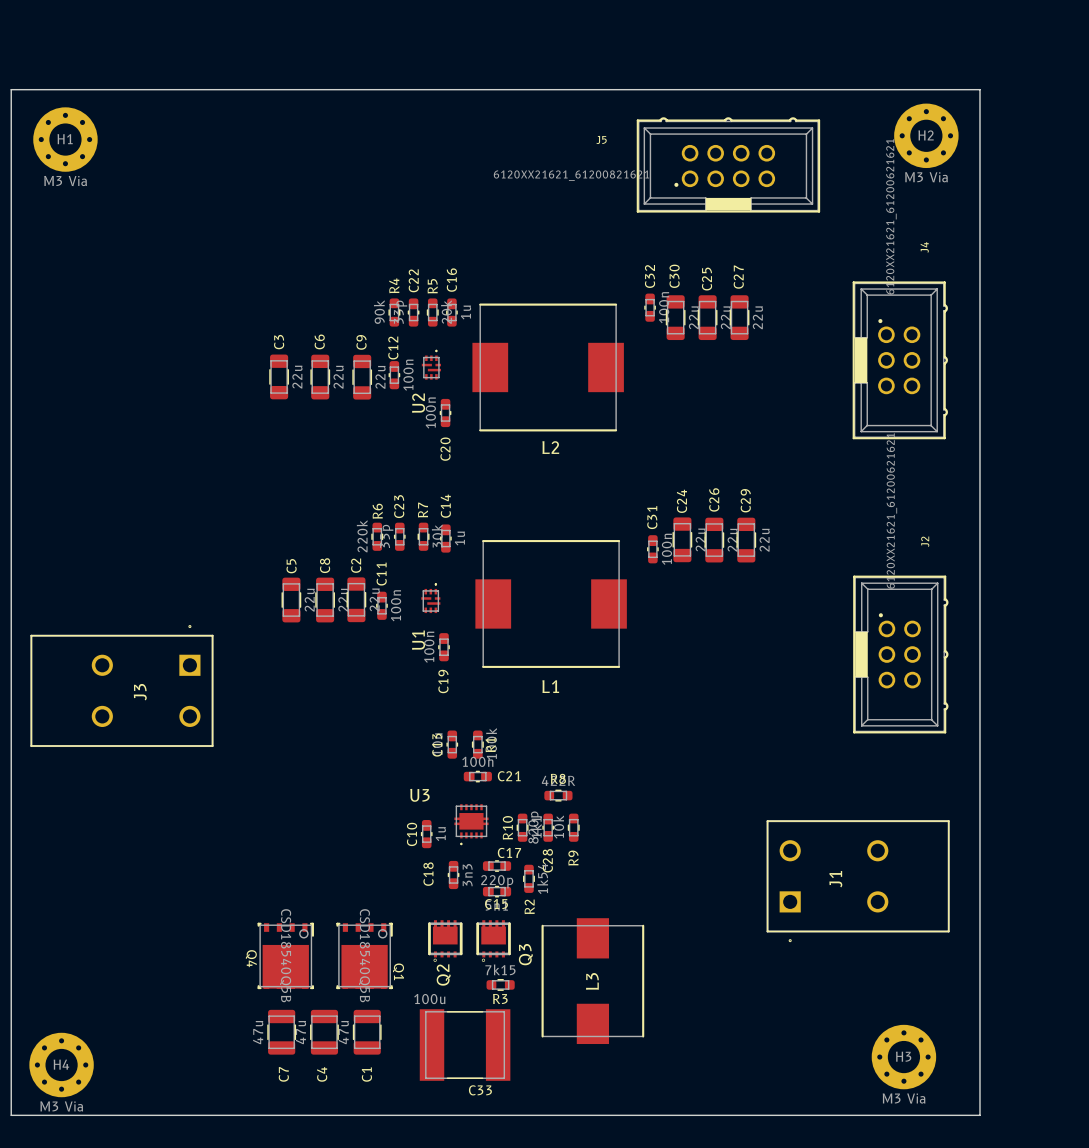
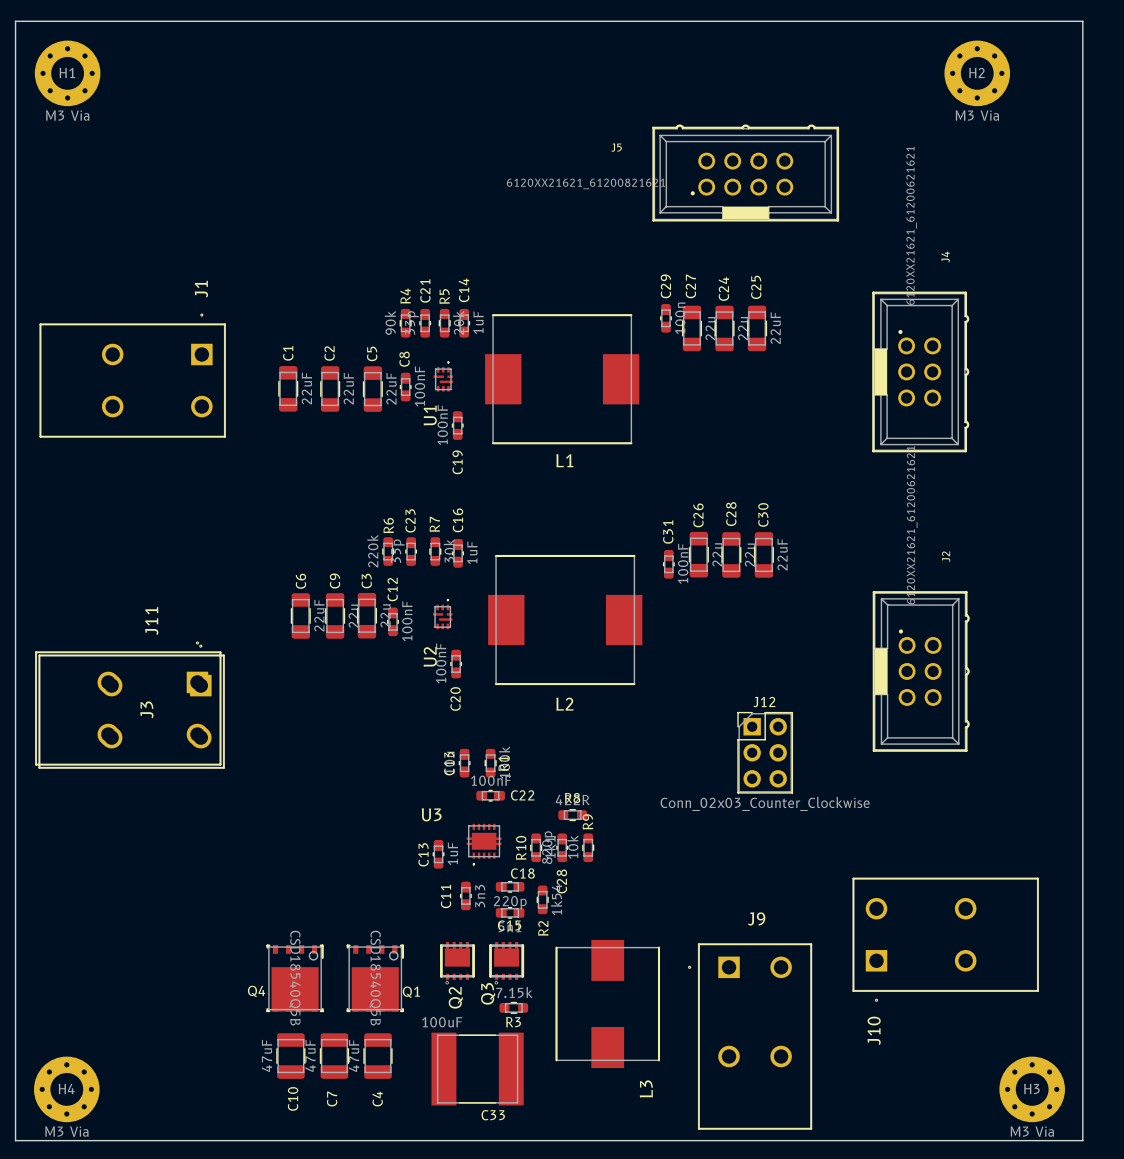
board edge: (11, 89) (979, 89) (979, 1115) -> (15, 96) (15, 21) (1082, 21) (1082, 1140) (1001, 1140)
H2 position: (926, 135) -> (977, 73)
H1 position: (65, 139) -> (67, 73)
C32 name: C32 (650, 276) -> C29 (665, 286)
C30 name: C30 (674, 276) -> C27 (690, 286)
C27 name: C27 (738, 277) -> C25 (756, 287)
C25 name: C25 (707, 279) -> C24 (723, 289)
C22 name: C22 (413, 280) -> C21 (425, 291)
C16 name: C16 (451, 280) -> C14 (464, 290)
C16 value: 1u (466, 312) -> 1uF (478, 322)
C27 value: 22u (757, 317) -> 22uF (775, 328)
C6 name: C6 (319, 341) -> C2 (329, 353)
C3 name: C3 (279, 342) -> C1 (288, 353)
C9 name: C9 (361, 342) -> C5 (372, 353)
C12 name: C12 (393, 348) -> C8 (404, 359)
C12 value: 100n (408, 375) -> 100nF (419, 386)
C3 value: 22u (297, 377) -> 22uF (306, 388)
C6 value: 22u (338, 377) -> 22uF (348, 388)
C9 value: 22u (380, 377) -> 22uF (391, 388)
U2 name: U2 (418, 403) -> U1 (430, 415)
C20 value: 100n (430, 413) -> 100nF (442, 425)
L2 name: L2 (550, 447) -> L1 (564, 460)
C20 name: C20 (445, 449) -> C19 (457, 462)
C26 name: C26 (714, 499) -> C28 (731, 514)
C29 name: C29 (745, 500) -> C30 (763, 514)
C24 name: C24 (681, 501) -> C26 (698, 515)
C14 name: C14 (445, 506) -> C16 (458, 520)
C14 value: 1u (459, 538) -> 1uF (472, 552)
C29 value: 22u (764, 540) -> 22uF (782, 554)
C31 value: 100n (666, 549) -> 100nF (683, 563)
C8 name: C8 (325, 565) -> C9 (335, 581)
C2 name: C2 (356, 565) -> C3 (366, 581)
C5 name: C5 (291, 566) -> C6 (300, 581)
C11 name: C11 (381, 574) -> C12 (392, 589)
C5 value: 22u (309, 600) -> 22uF (319, 615)
C11 value: 100n (396, 605) -> 100nF (407, 621)
U1 name: U1 (418, 640) -> U2 (430, 656)
C19 value: 100n (429, 647) -> 100nF (441, 663)
C19 name: C19 (443, 681) -> C20 (455, 698)
L1 name: L1 (550, 686) -> L2 (564, 704)
J11: none -> (131, 706)
J12: none -> Conn_02x03_Counter_Clockwise (765, 752)
C21 value: 100n (477, 761) -> 100nF (491, 780)
C21 name: C21 (509, 776) -> C22 (522, 795)
C10 name: C10 (412, 834) -> C13 (423, 854)
C10 value: 1u (440, 834) -> 1uF (452, 853)
C17 name: C17 (509, 852) -> C18 (522, 873)
R9 name position: R9 (573, 858) -> R9 (587, 821)
C18 name: C18 (428, 874) -> C11 (446, 896)
J1 name position: J1 (835, 879) -> J1 (201, 289)
J1 rotation: 0° (858, 881) -> 180° (132, 375)
J1 position: (858, 881) -> (132, 375)
J10: none -> (945, 939)
Q3 name position: Q3 (525, 954) -> Q3 (488, 993)
Q4 name rotation: 0° (251, 958) -> 90° counterclockwise (256, 991)
R3 value: 7k15 (500, 969) -> 7.15k (514, 992)
Q1 name rotation: 0° (398, 971) -> 90° counterclockwise (411, 992)
L3 name position: L3 (592, 981) -> L3 (646, 1088)
C33 value: 100u (429, 999) -> 100uF (442, 1022)
J9: none -> (750, 1036)
C7 value: 47u (258, 1032) -> 47uF (266, 1055)
C4 value: 47u (300, 1032) -> 47uF (310, 1055)
C1 value: 47u (343, 1032) -> 47uF (354, 1055)
H3 position: (903, 1057) -> (1032, 1089)
C7 name: C7 (283, 1074) -> C10 (293, 1098)
C4 name: C4 (322, 1074) -> C7 (332, 1098)
C1 name: C1 (366, 1074) -> C4 (377, 1098)

